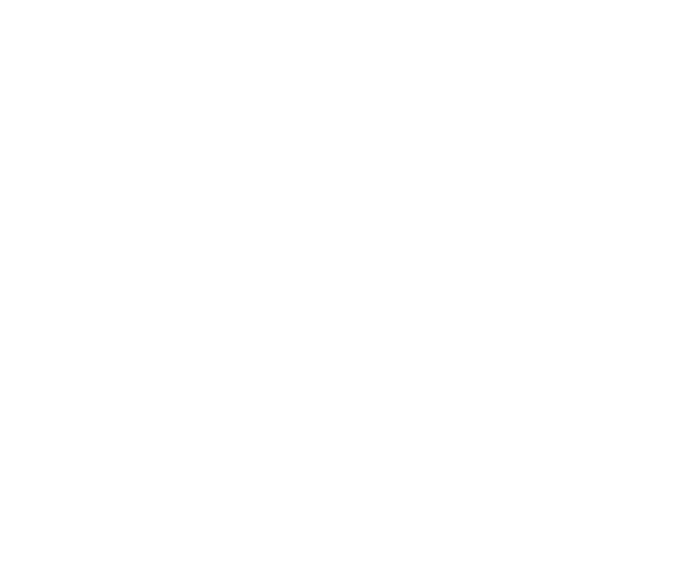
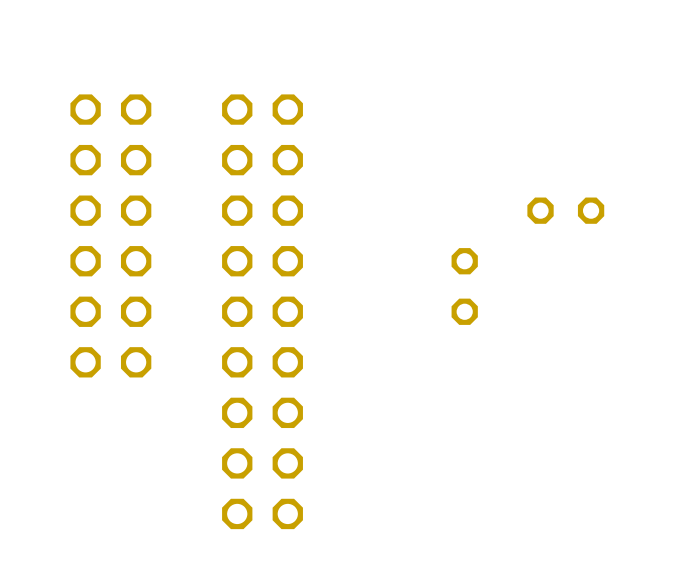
part: none -> (110, 134)
part: none -> (565, 210)
part: none -> (110, 235)
part: none -> (464, 286)
part: none -> (262, 311)
part: none -> (110, 337)

